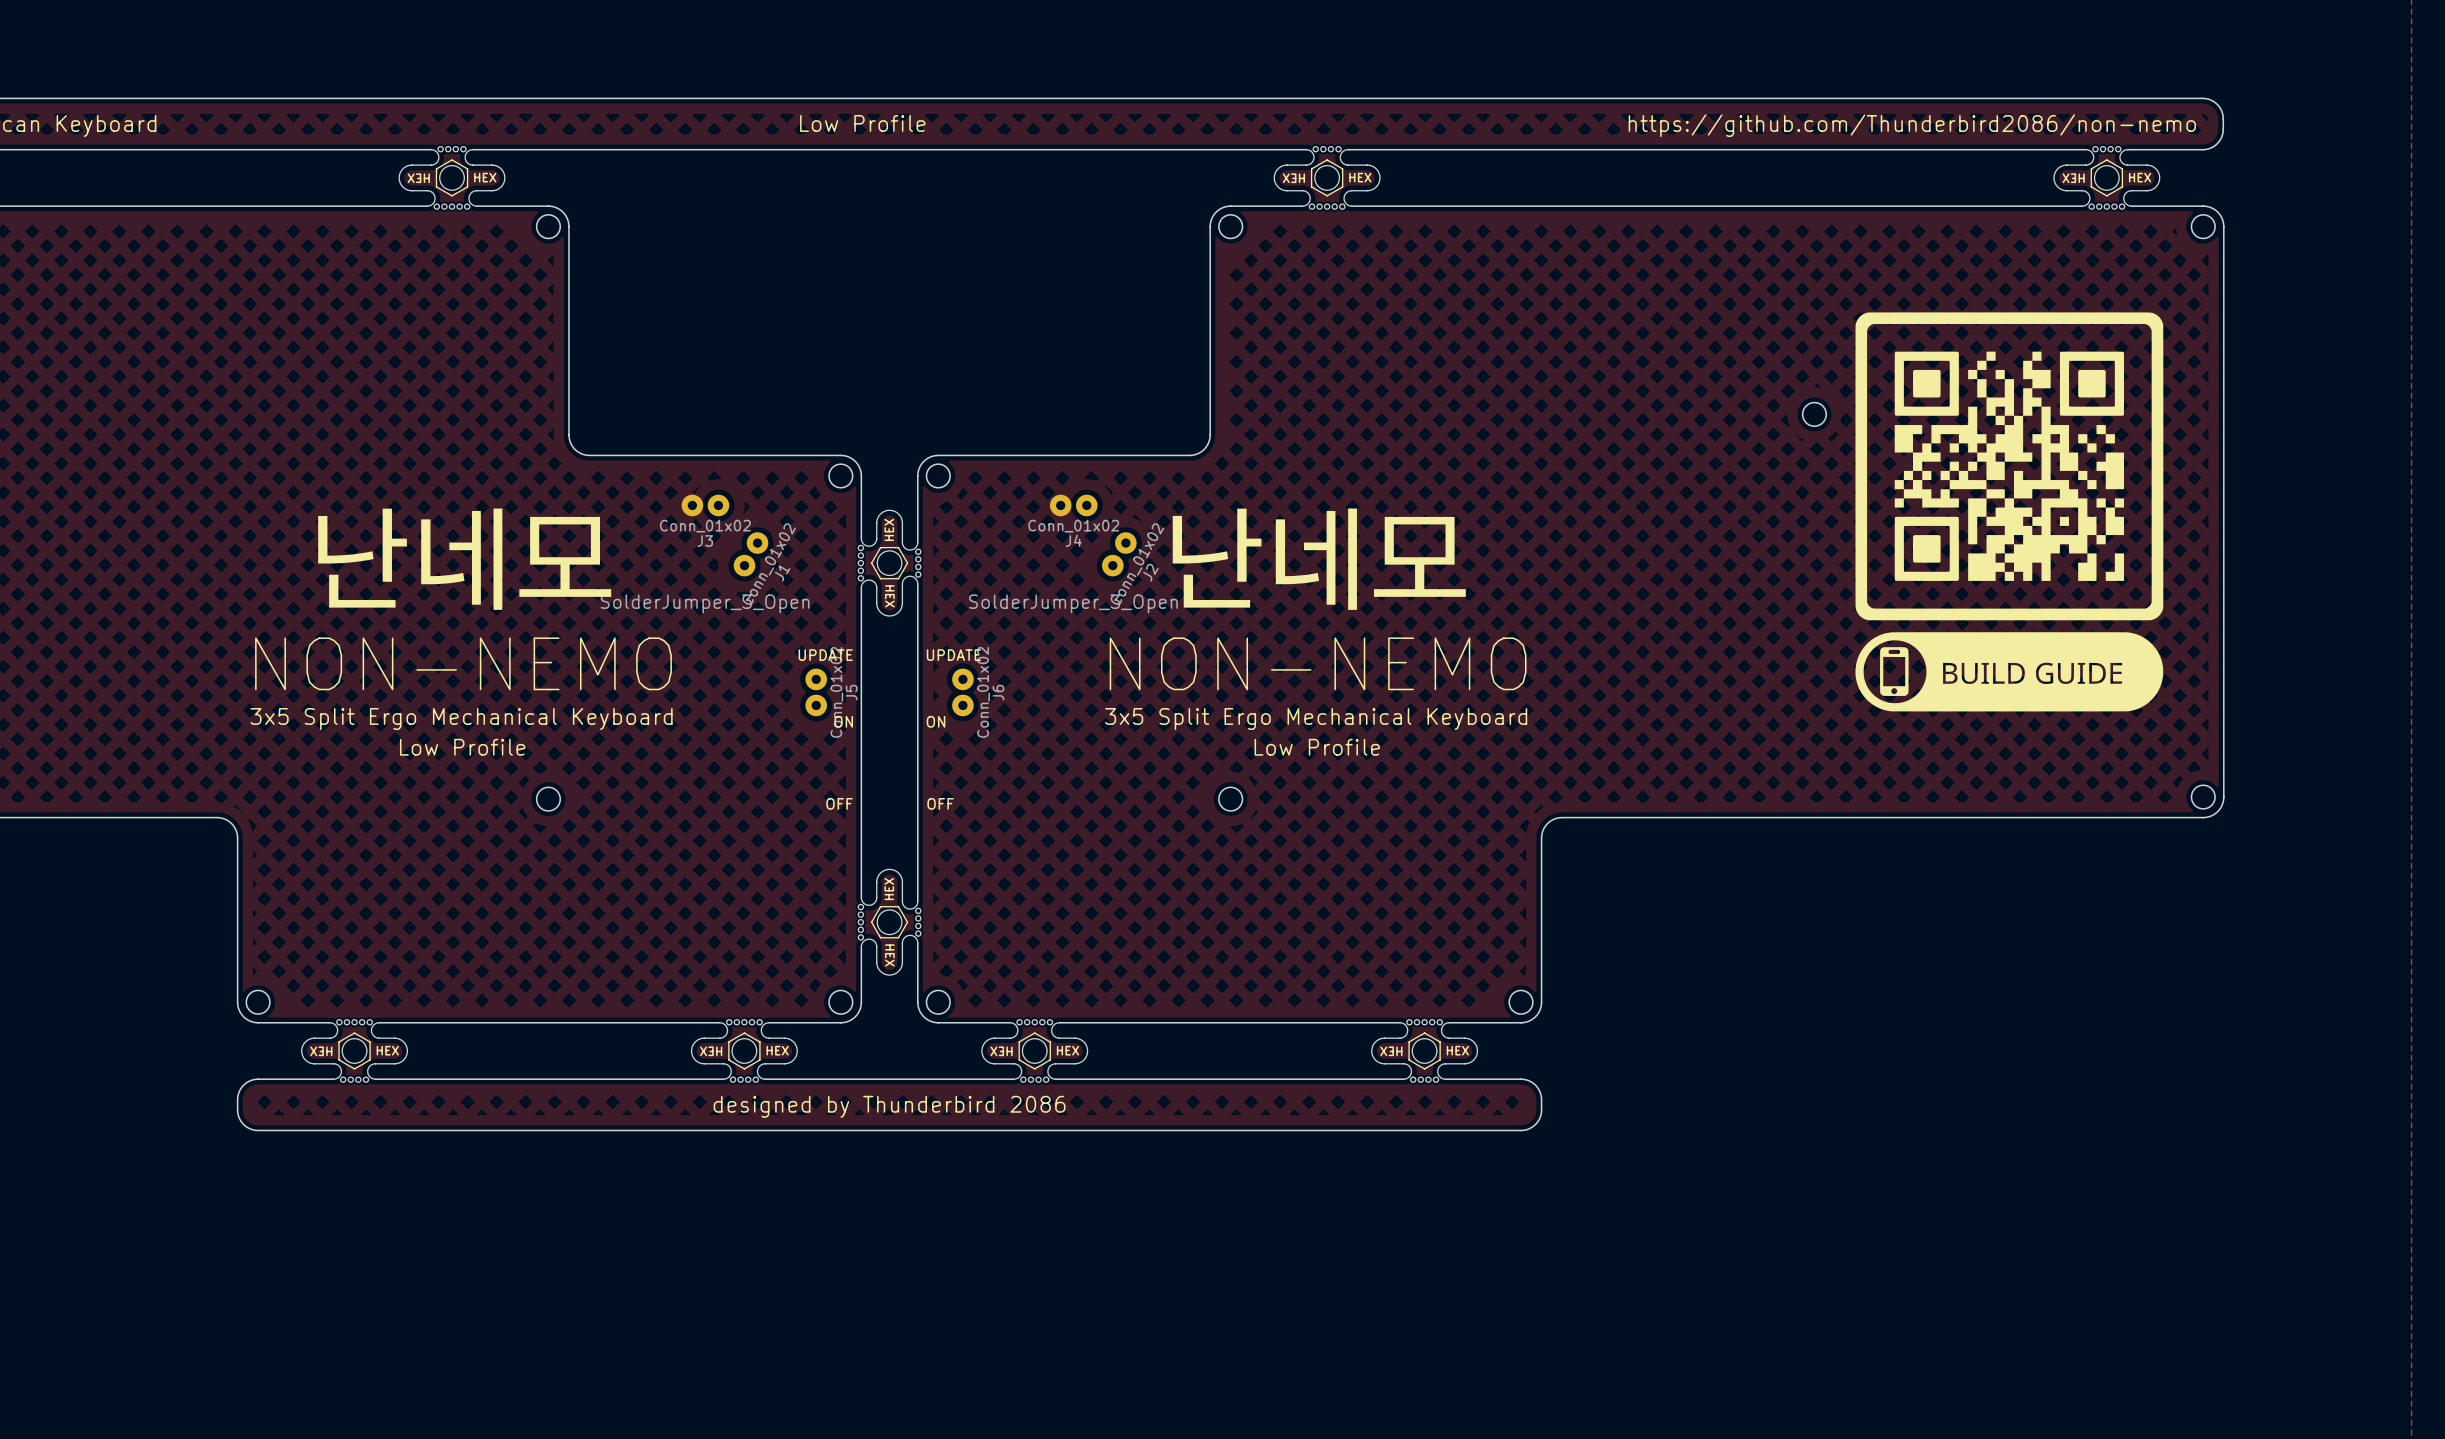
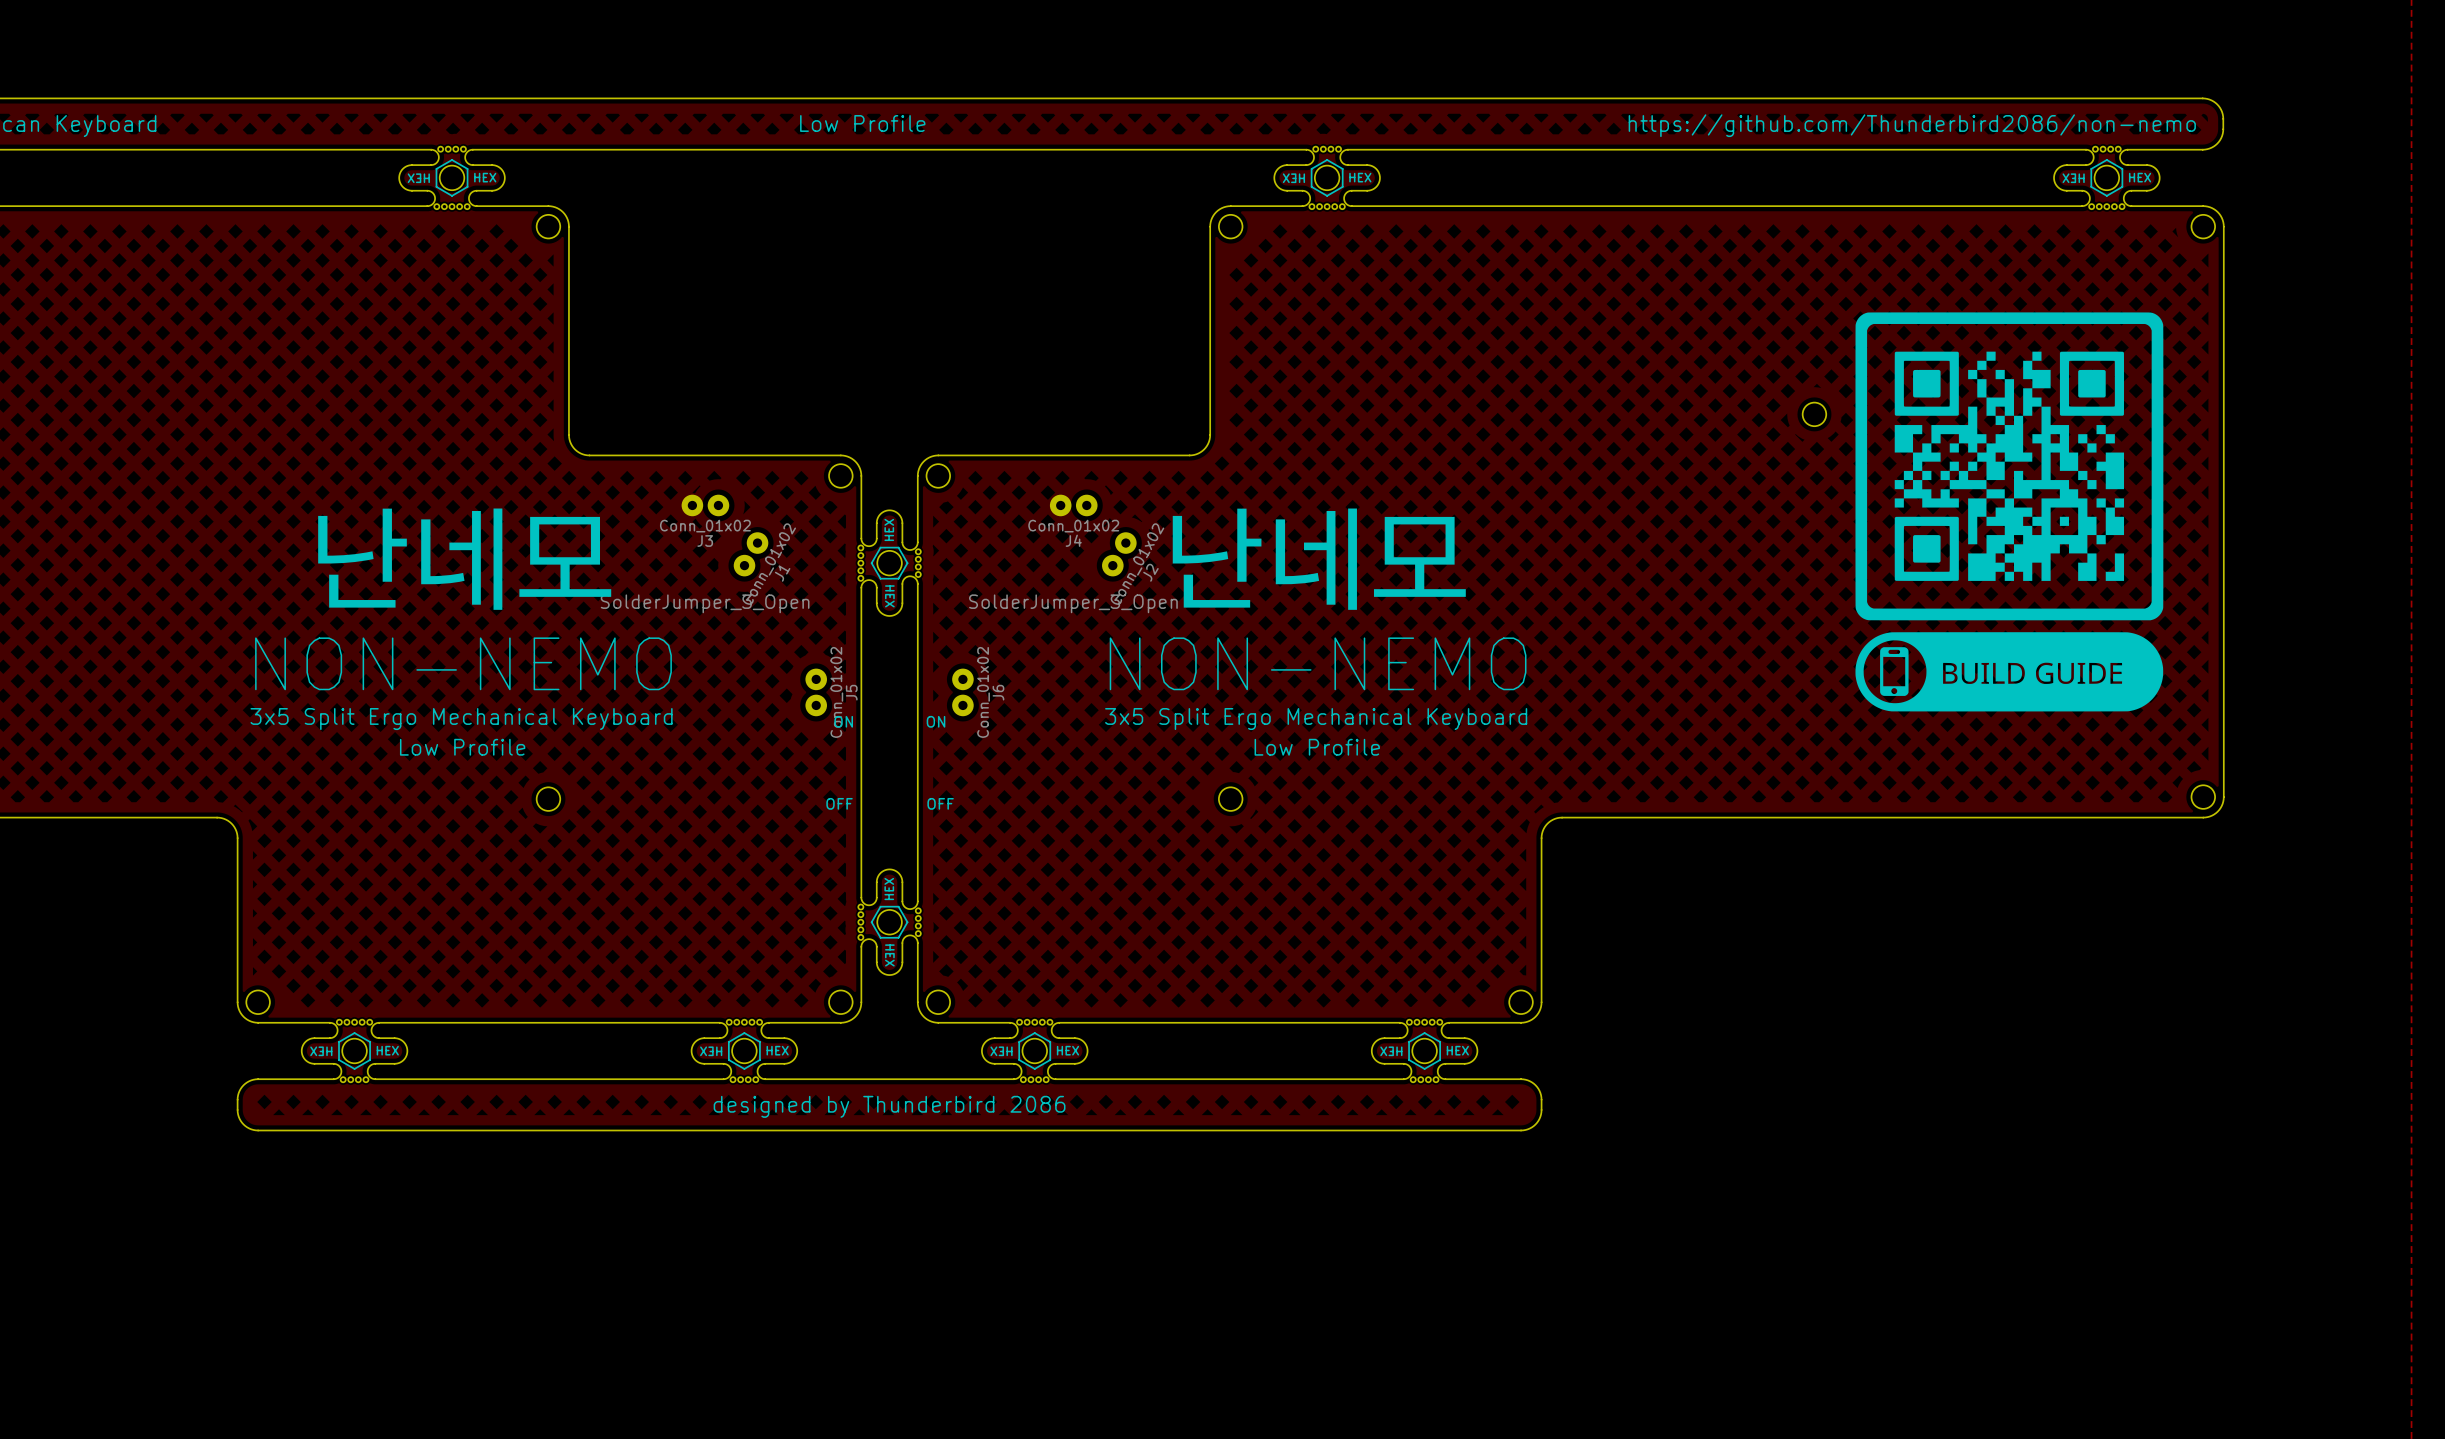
text: UPDATE (825, 655) -> none
text: UPDATE (953, 655) -> none

